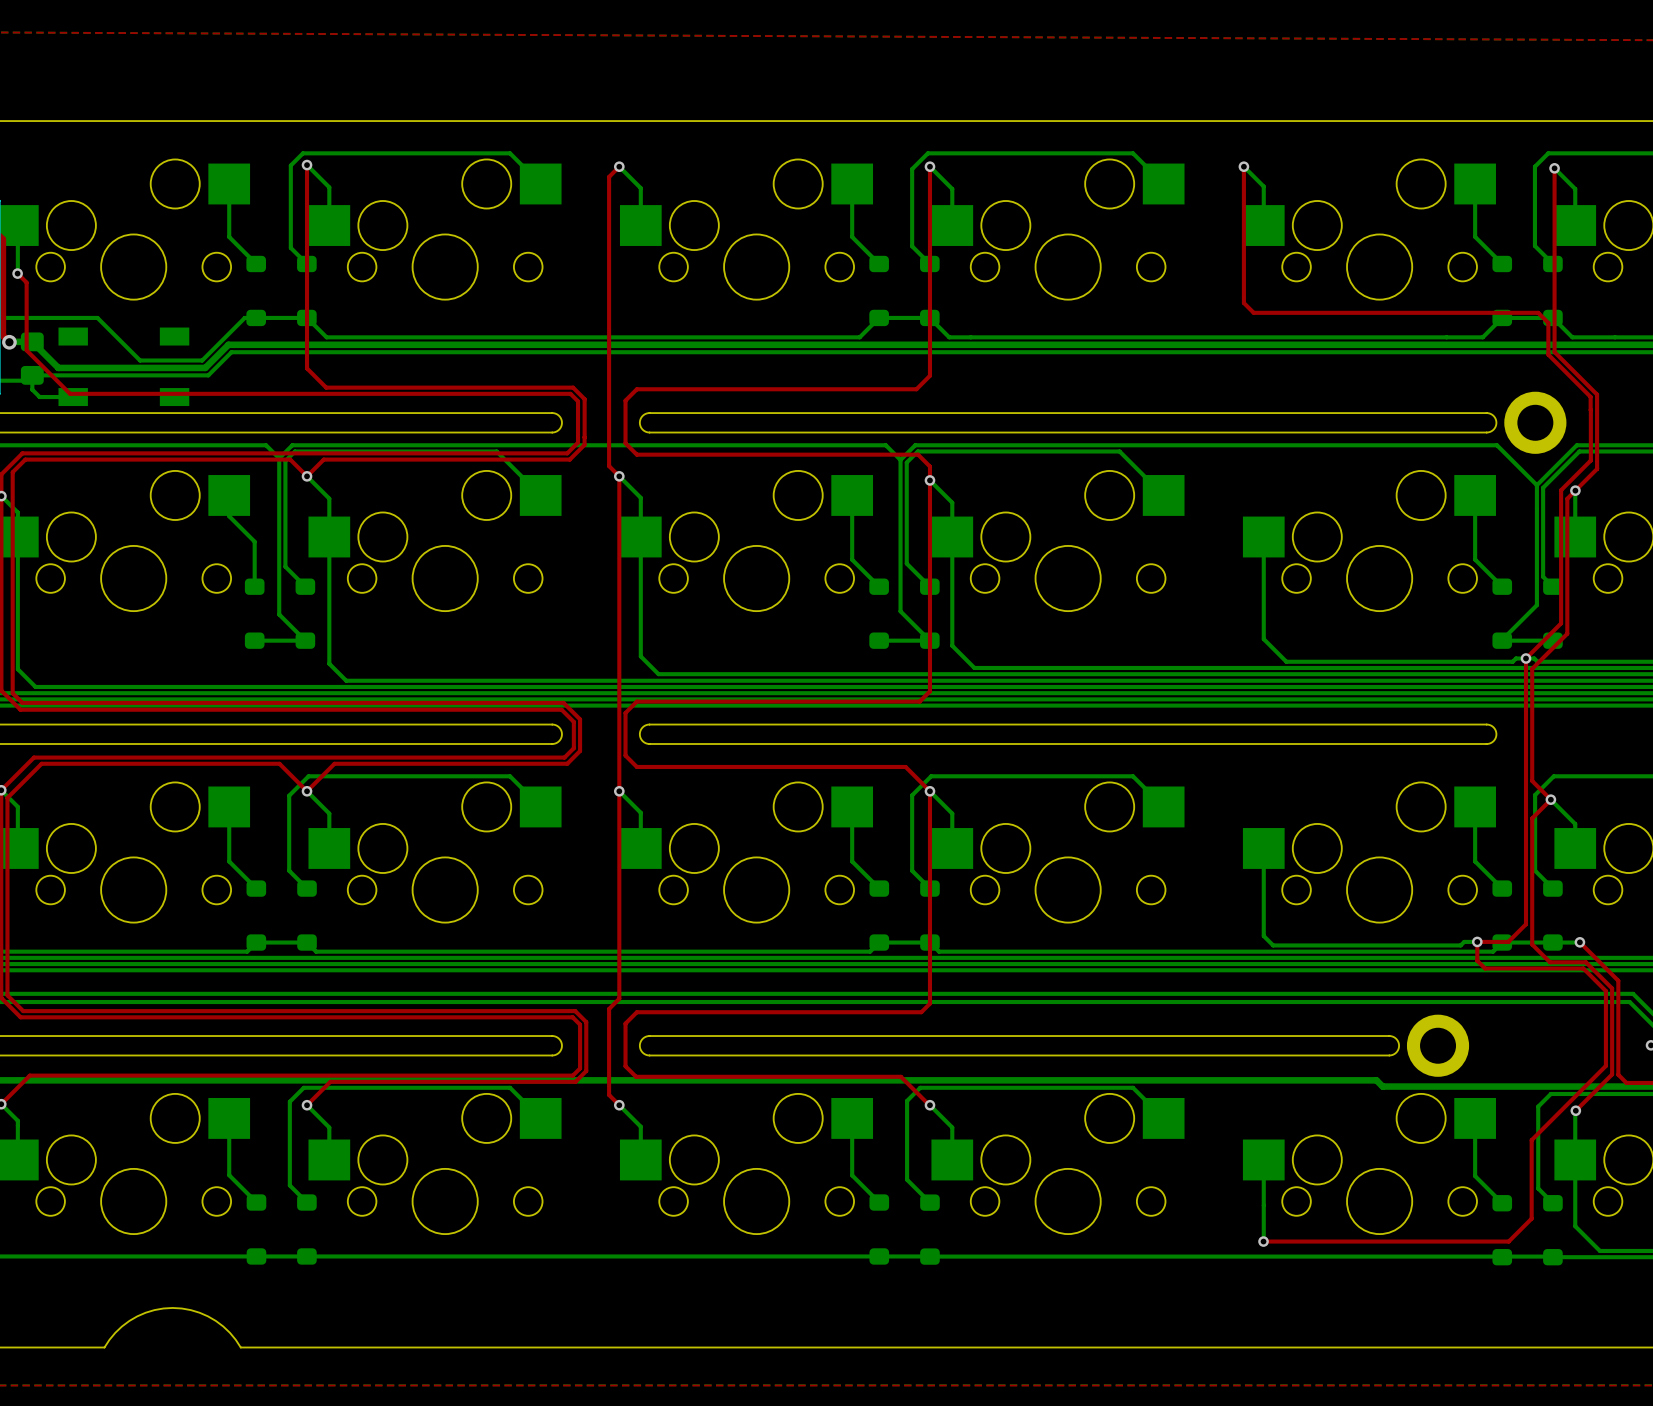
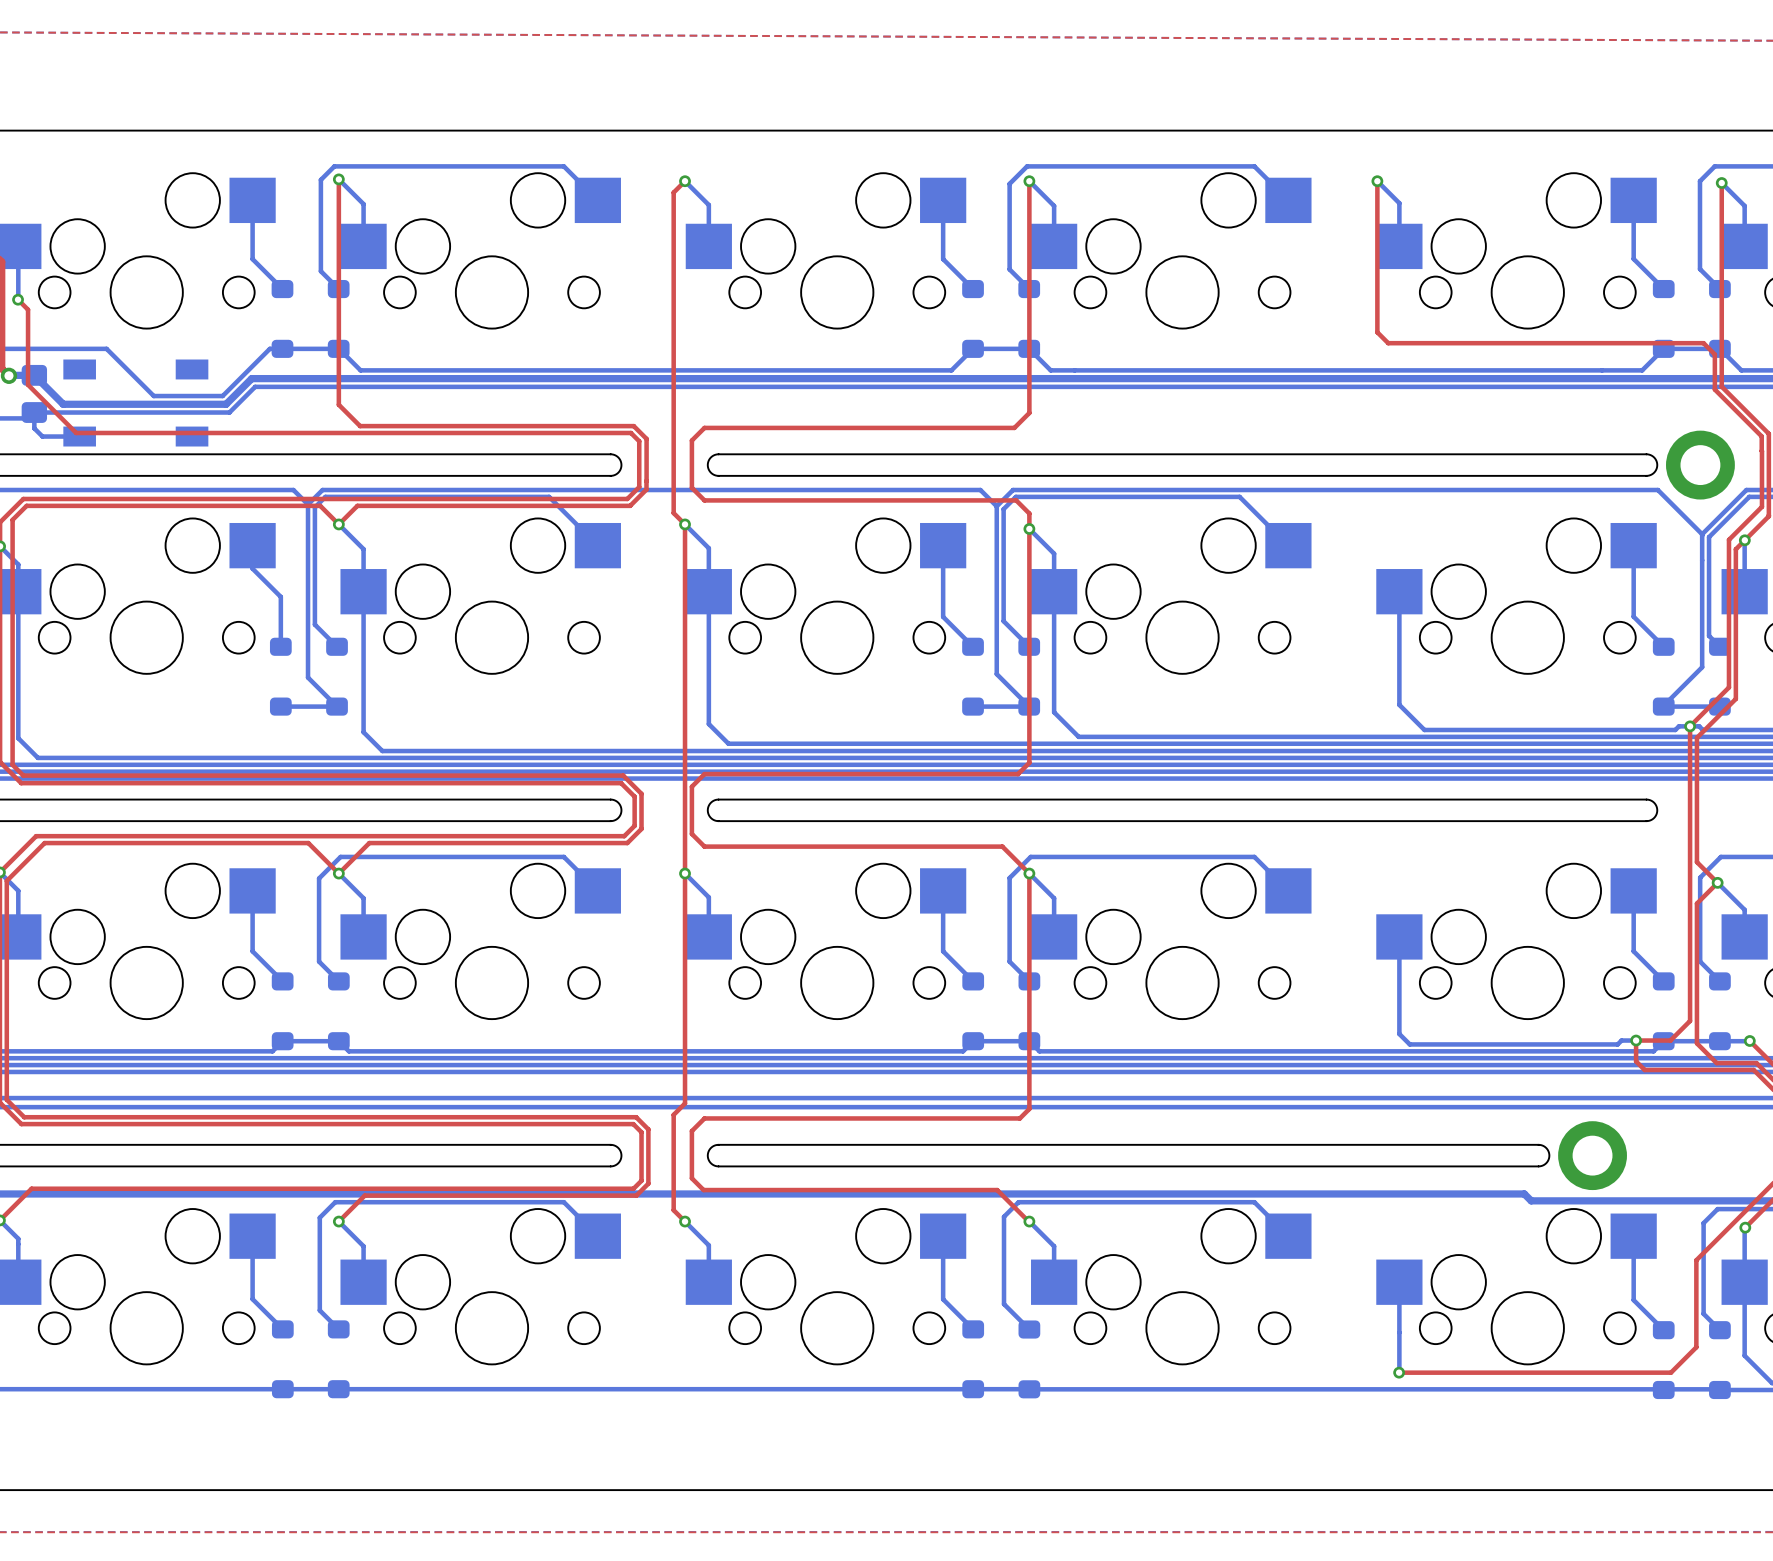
board edge: (104, 1347) (115, 1332) (137, 1316) (154, 1310) (172, 1307) (190, 1310) (215, 1320) (229, 1332) (240, 1347) -> (114, 1490) (265, 1490)

